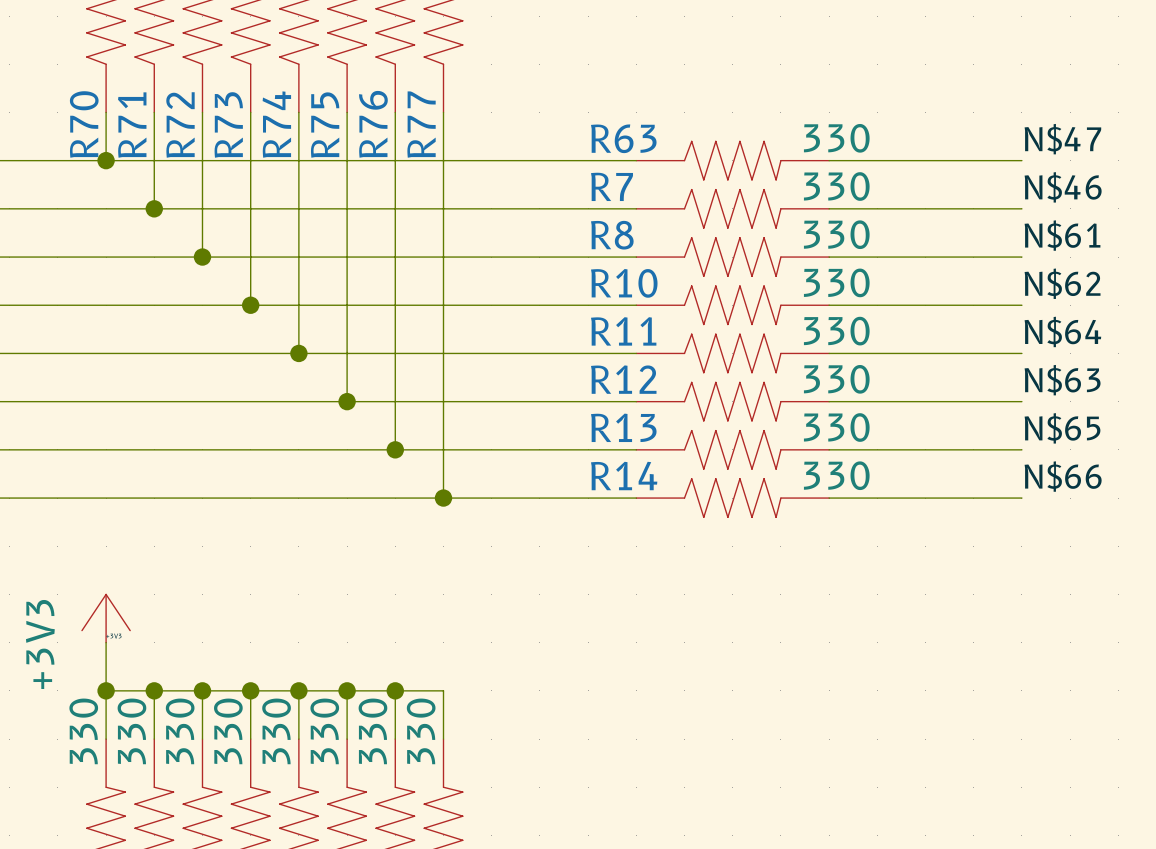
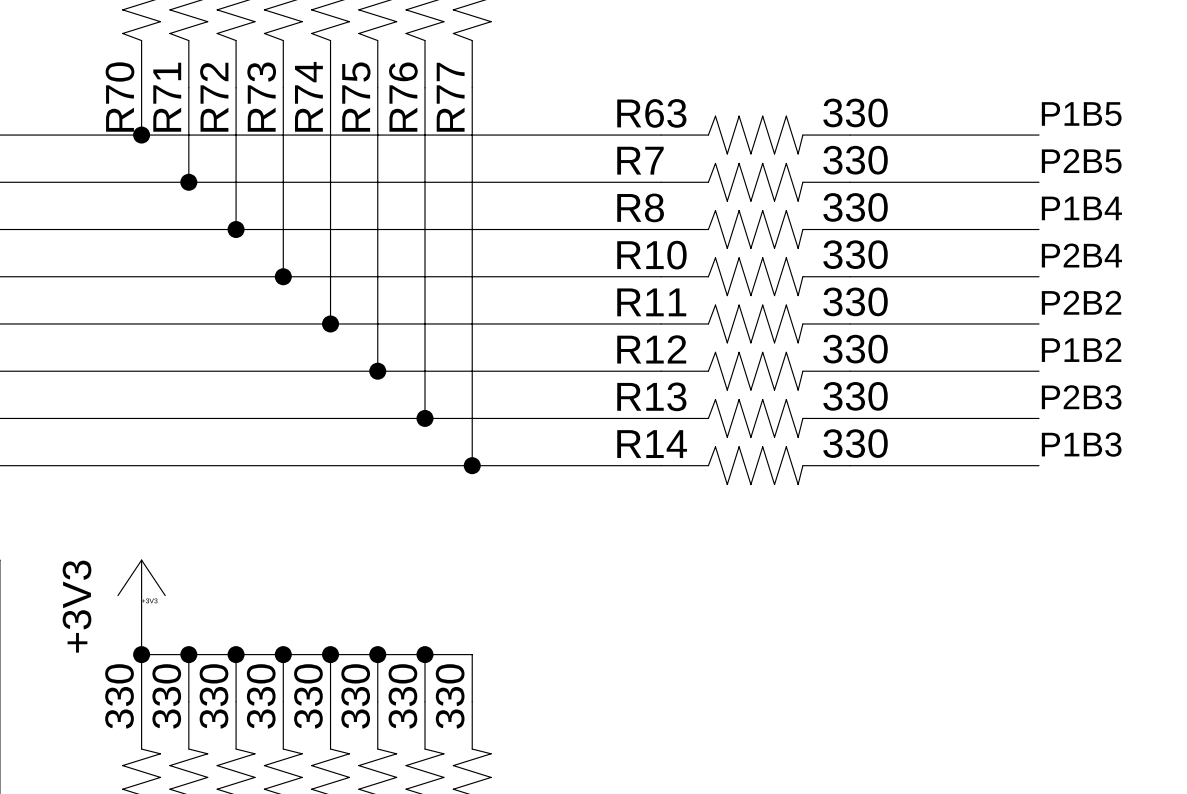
label: N$47 (1062, 139) -> P1B5 (1081, 114)
label: N$46 (1063, 187) -> P2B5 (1081, 161)
label: N$61 (1062, 235) -> P1B4 (1081, 208)
label: N$62 (1062, 283) -> P2B4 (1081, 255)
label: N$64 (1062, 331) -> P2B2 (1081, 302)
label: N$63 (1062, 380) -> P1B2 (1081, 349)
label: N$65 (1062, 428) -> P2B3 (1081, 397)
label: N$66 (1063, 476) -> P1B3 (1081, 444)

